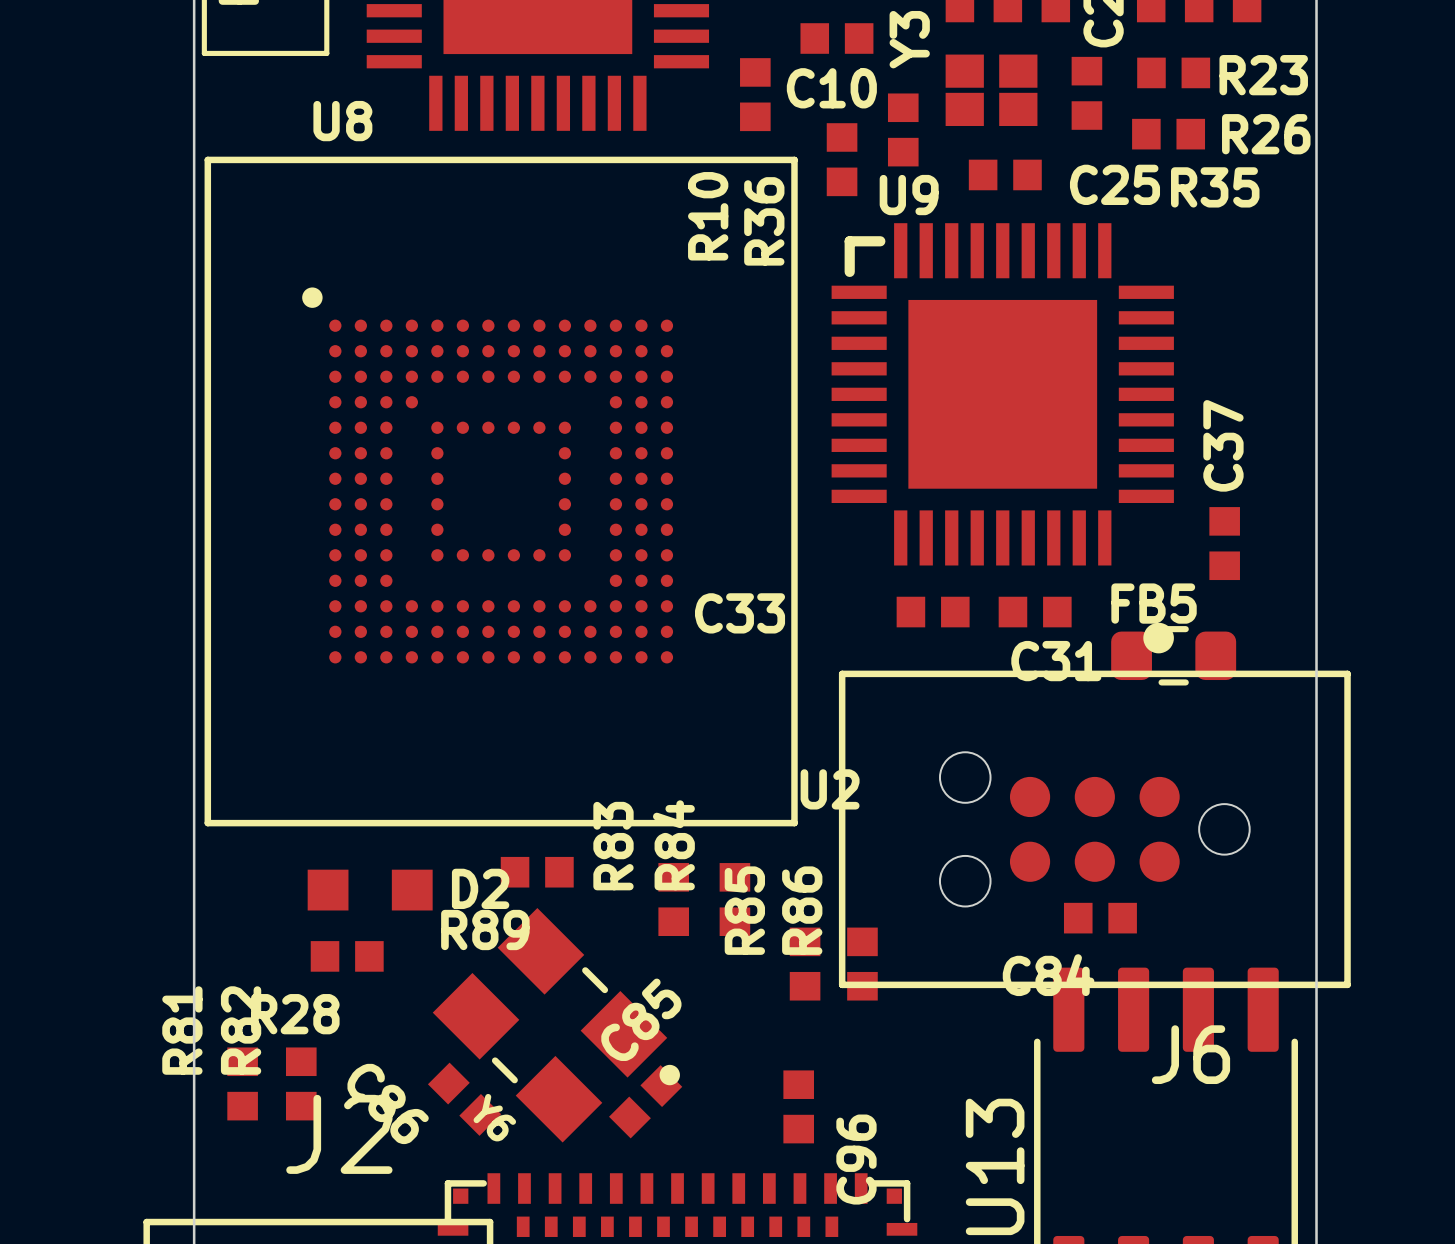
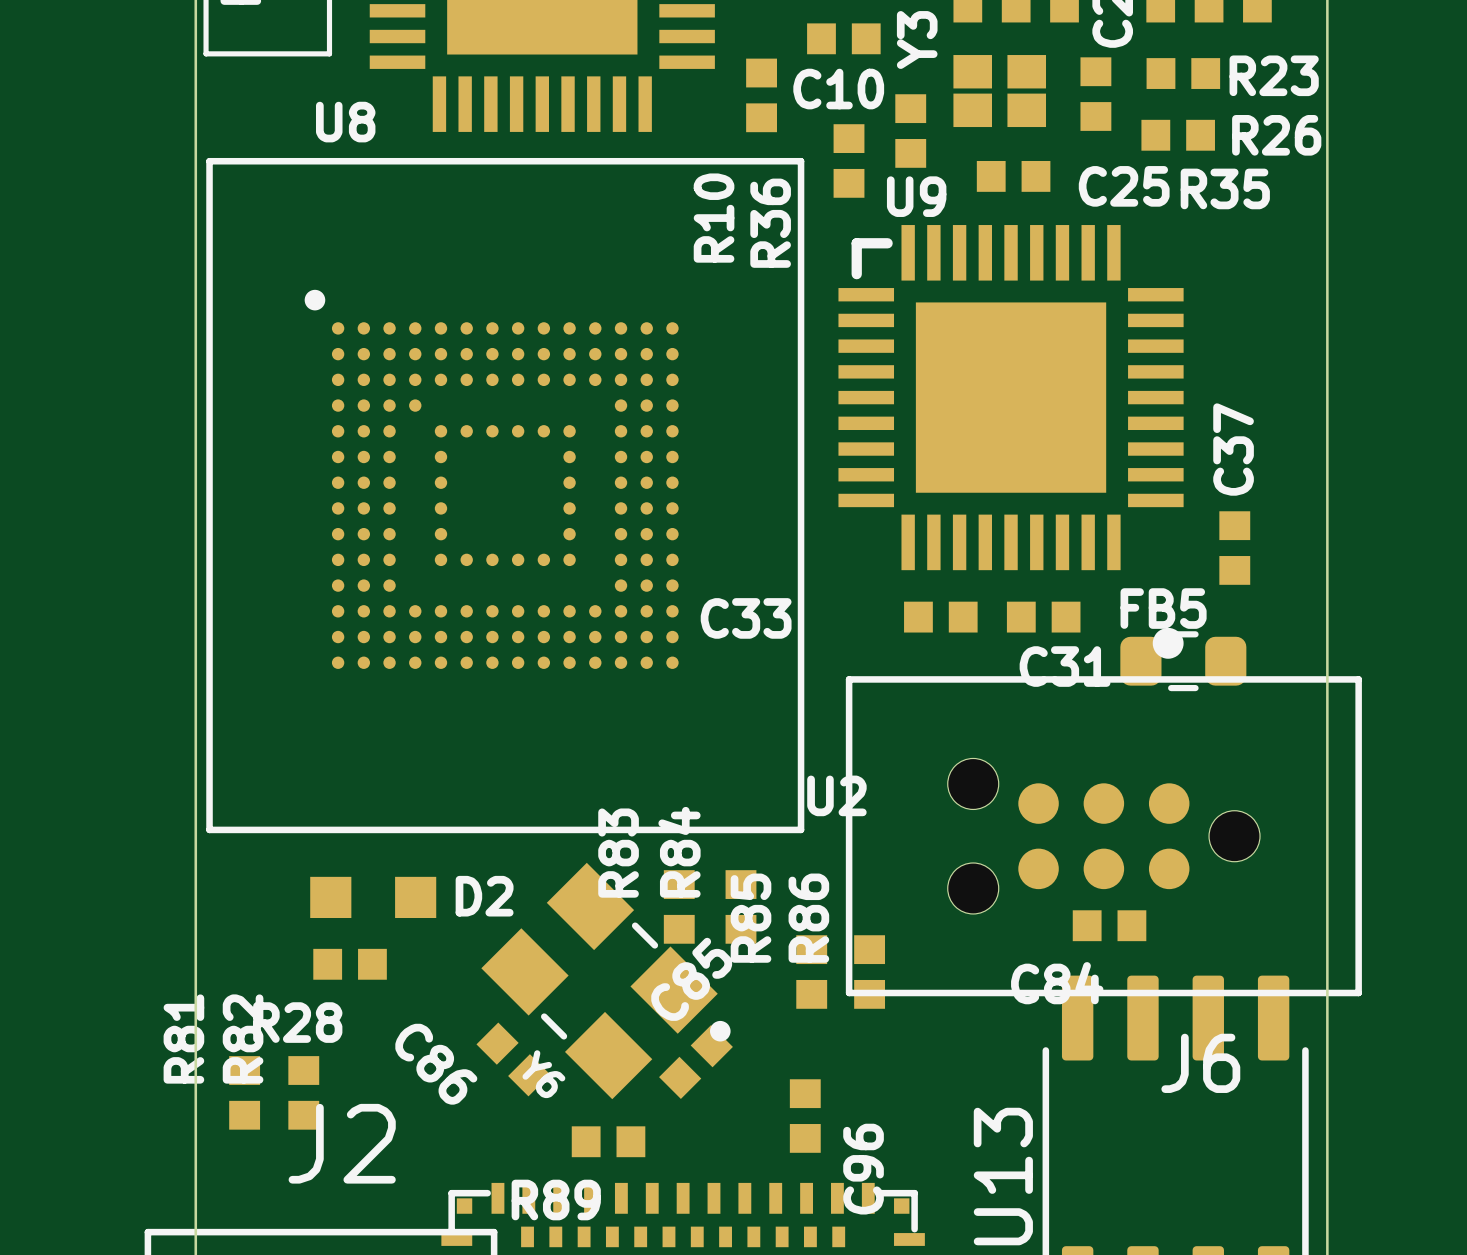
R89 position: (537, 872) -> (608, 1141)
Y6 position: (556, 1025) -> (605, 981)
C86 position: (464, 1099) -> (513, 1059)
C85 position: (645, 1101) -> (695, 1062)

